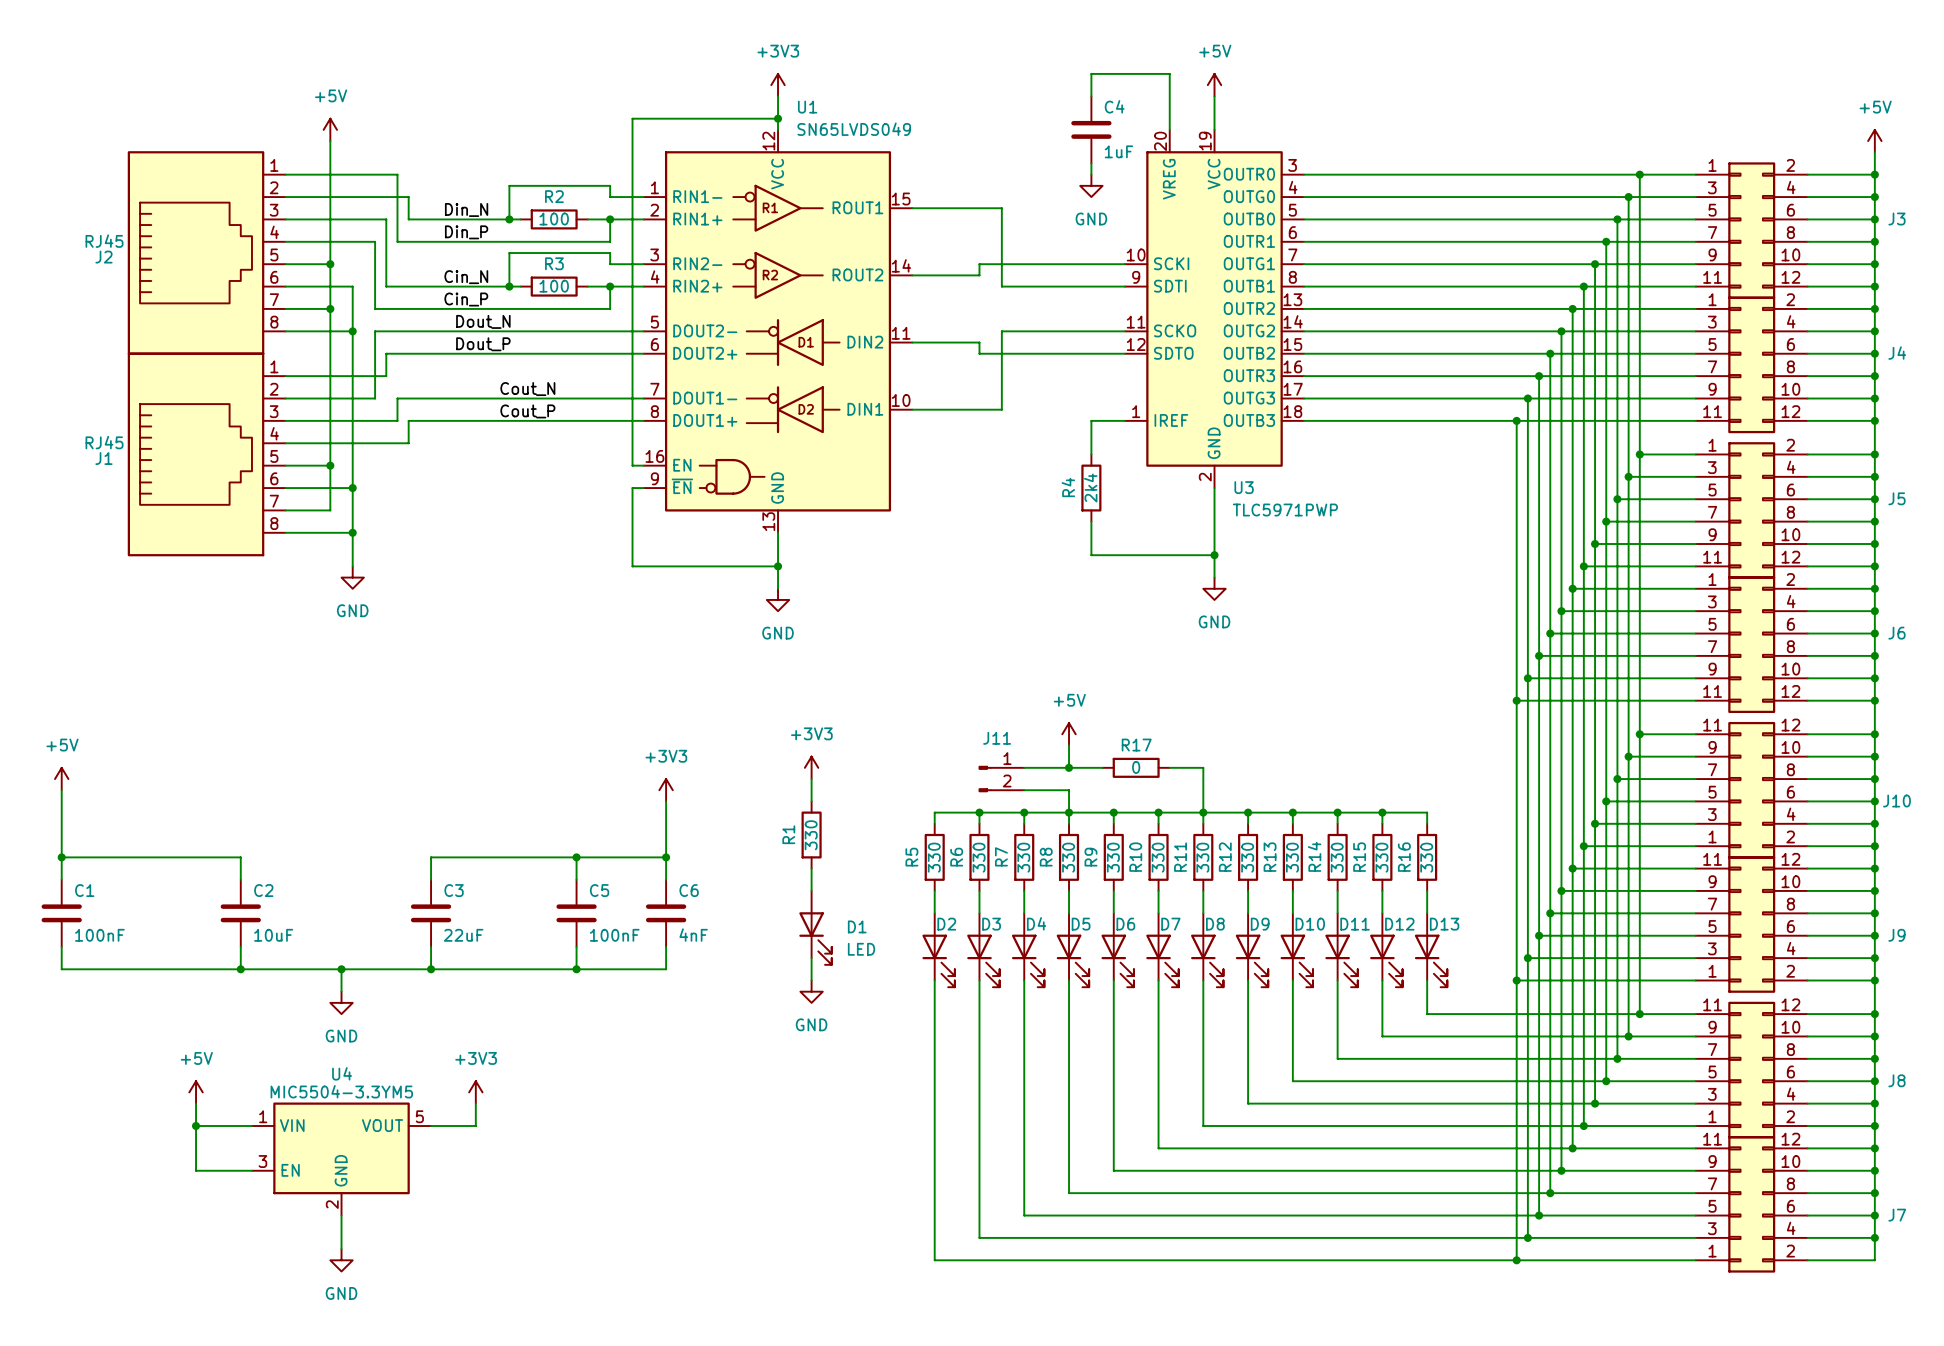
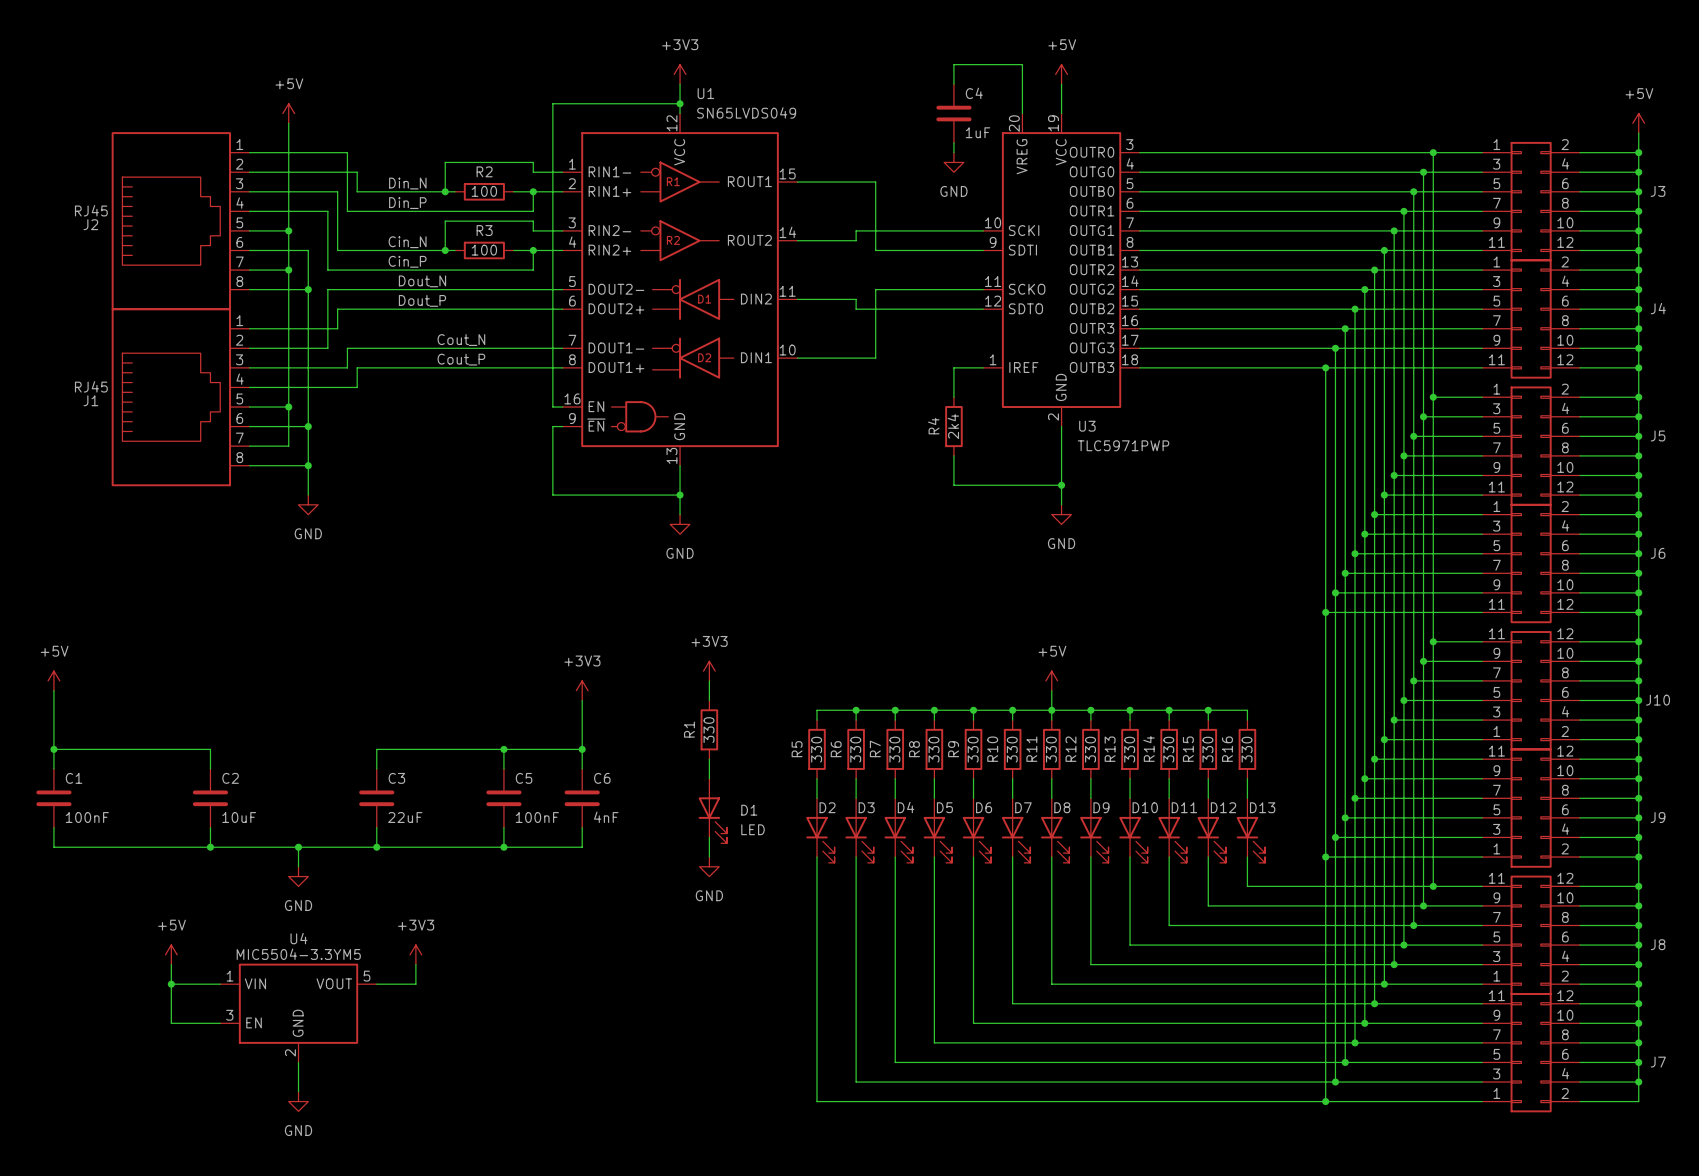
power symbol position: +5V (1069, 734) -> +5V (1051, 680)
wire: (1069, 745) (1069, 767) -> none
wire: (1024, 767) (1102, 767) -> none
junction: (1069, 767) -> none
R17: 0 (1136, 767) -> none
wire: (1169, 767) (1203, 767) (1203, 790) -> none
J11: (1001, 779) -> none
wire: (1024, 790) (1069, 790) (1069, 812) -> none

